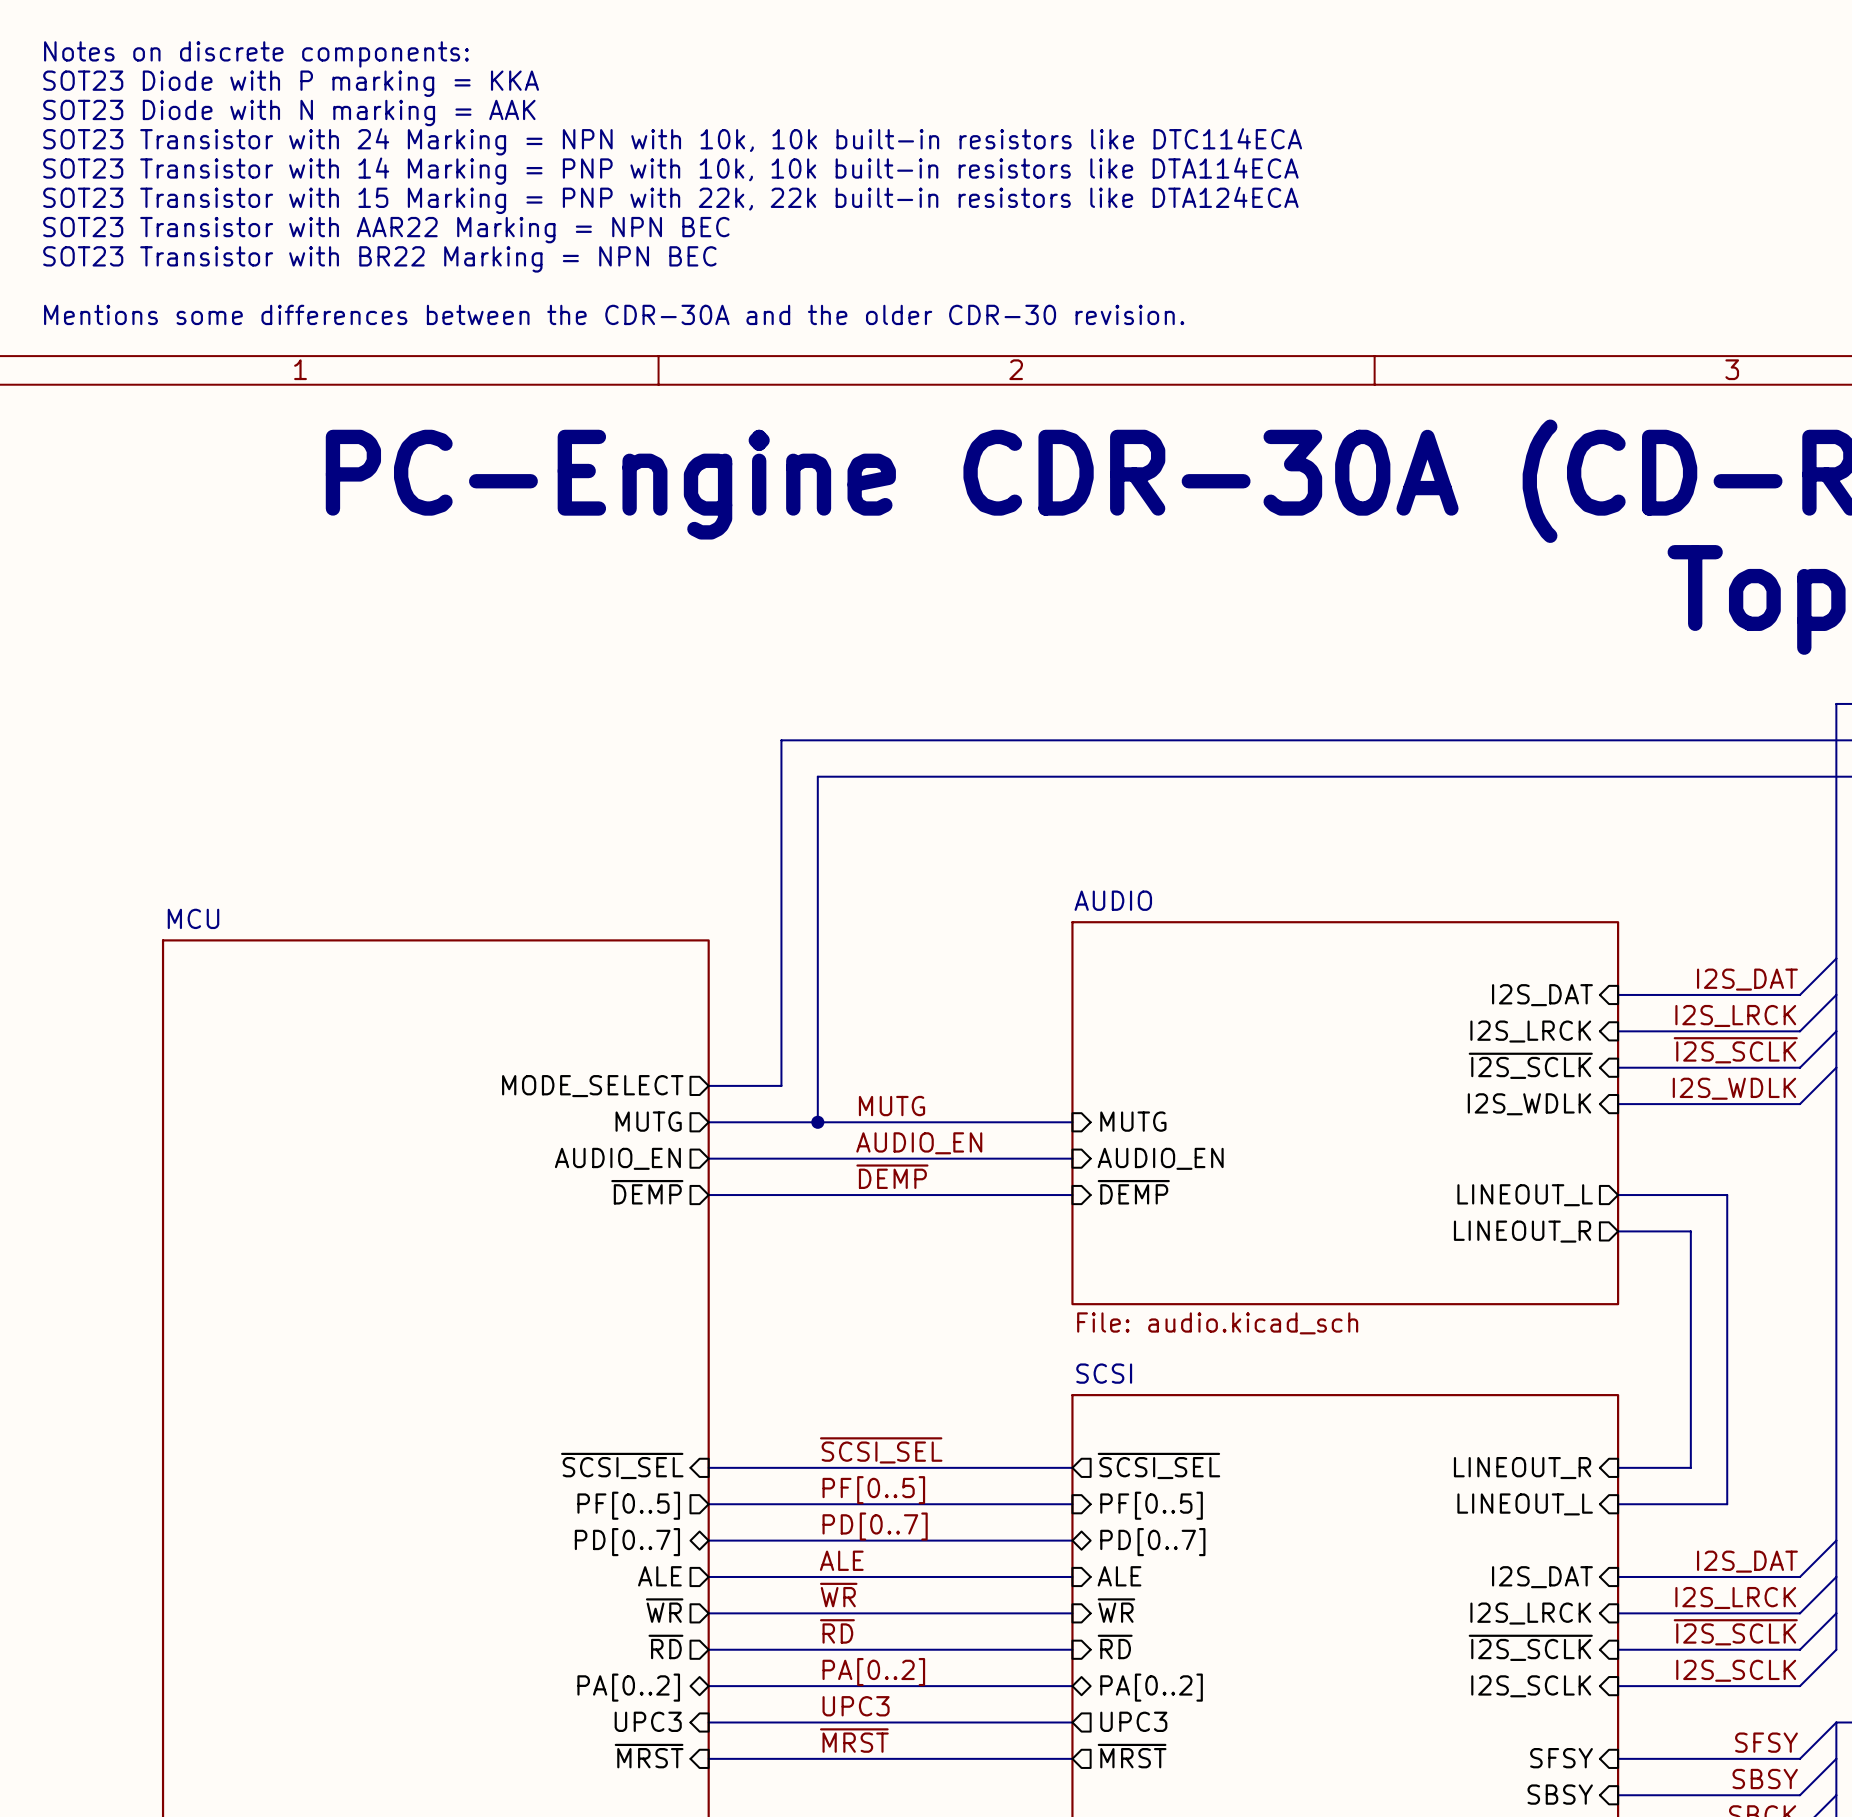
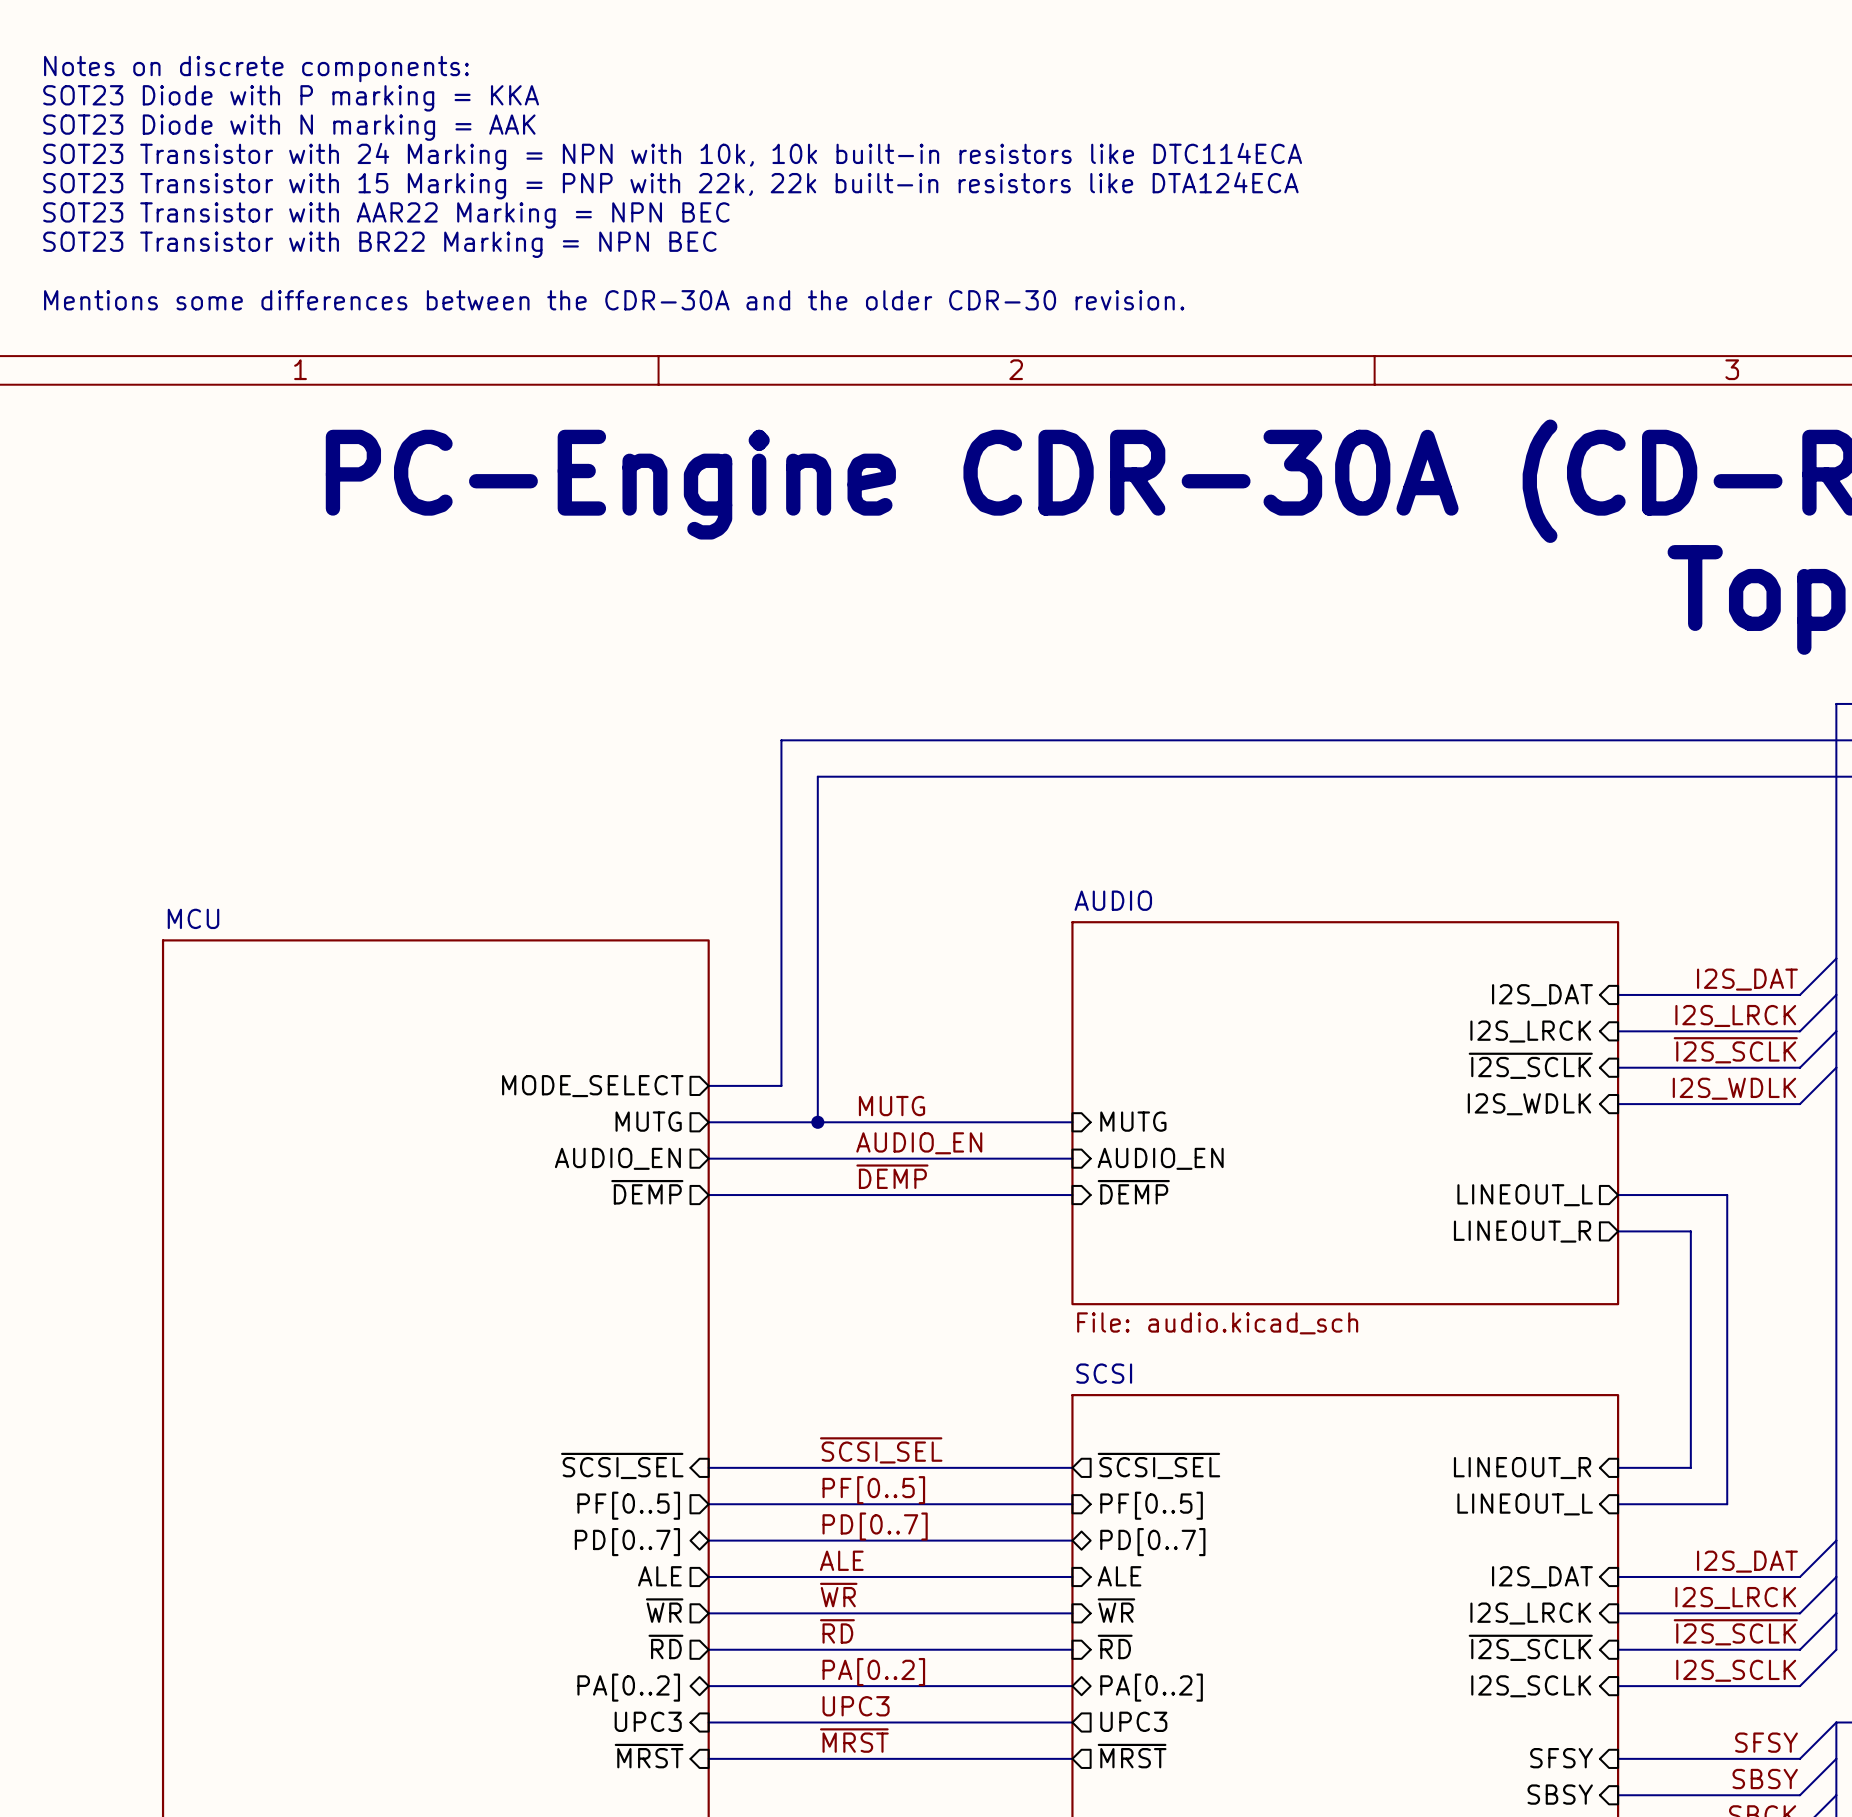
text position: Notes on discrete components: (256, 54) -> Notes on discrete components: (256, 69)
text position: SOT23 Diode with P marking = KKA (291, 83) -> SOT23 Diode with P marking = KKA (291, 98)
text position: SOT23 Diode with N marking = AAK (289, 112) -> SOT23 Diode with N marking = AAK (289, 127)
text position: SOT23 Transistor with 24 Marking = NPN with 10k, 10k built-in resistors like DTC114ECA (672, 141) -> SOT23 Transistor with 24 Marking = NPN with 10k, 10k built-in resistors like DTC114ECA (672, 156)
text: SOT23 Transistor with 14 Marking = PNP with 10k, 10k built-in resistors like DTA114ECA (670, 171) -> none
text position: SOT23 Transistor with 15 Marking = PNP with 22k, 22k built-in resistors like DTA124ECA (670, 200) -> SOT23 Transistor with 15 Marking = PNP with 22k, 22k built-in resistors like DTA124ECA (670, 185)
text position: SOT23 Transistor with AAR22 Marking = NPN BEC (386, 230) -> SOT23 Transistor with AAR22 Marking = NPN BEC (386, 215)
text position: SOT23 Transistor with BR22 Marking = NPN BEC (379, 259) -> SOT23 Transistor with BR22 Marking = NPN BEC (379, 244)
text position: Mentions some differences between the CDR-30A and the older CDR-30 revision. (614, 314) -> Mentions some differences between the CDR-30A and the older CDR-30 revision. (614, 300)

